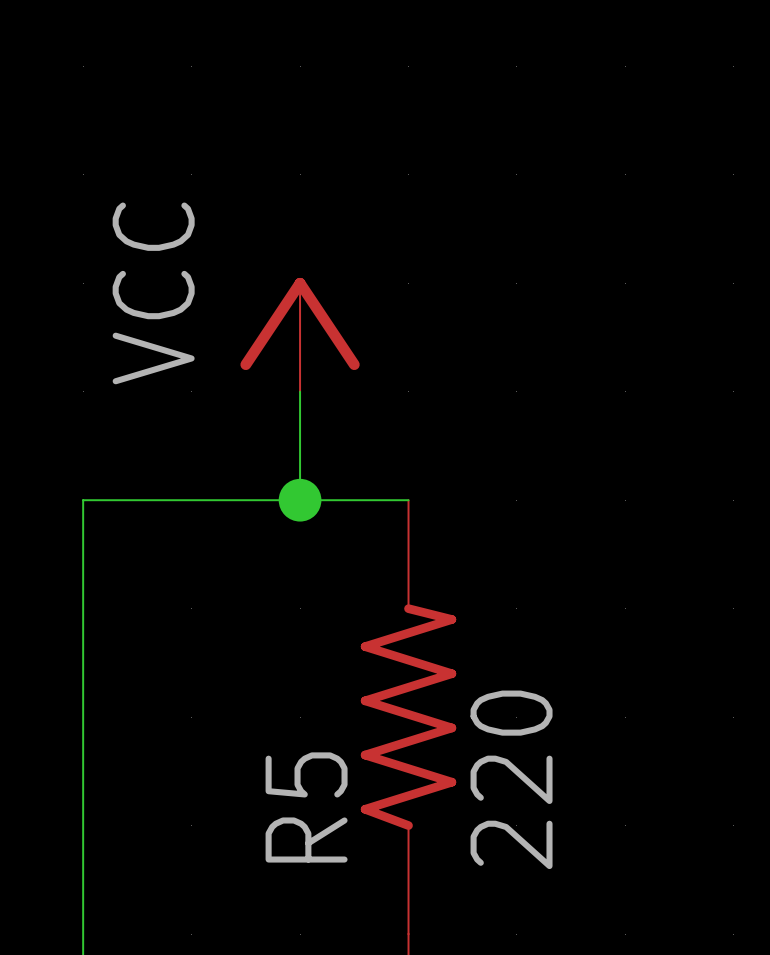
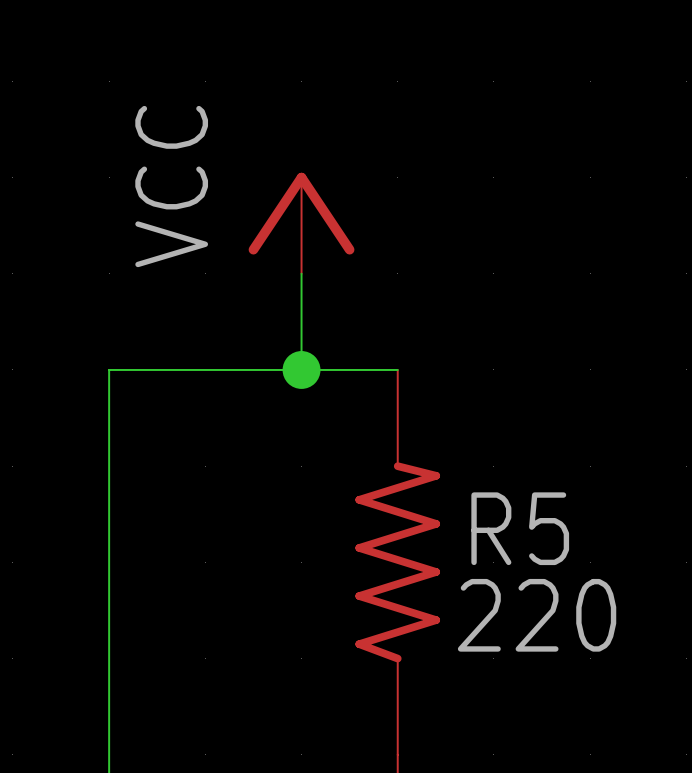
R5 value rotation: 0° (511, 779) -> 90° clockwise (537, 615)
R5 name rotation: 0° (306, 807) -> 90° clockwise (520, 528)
R5 name position: R5 (306, 807) -> R5 (520, 528)

